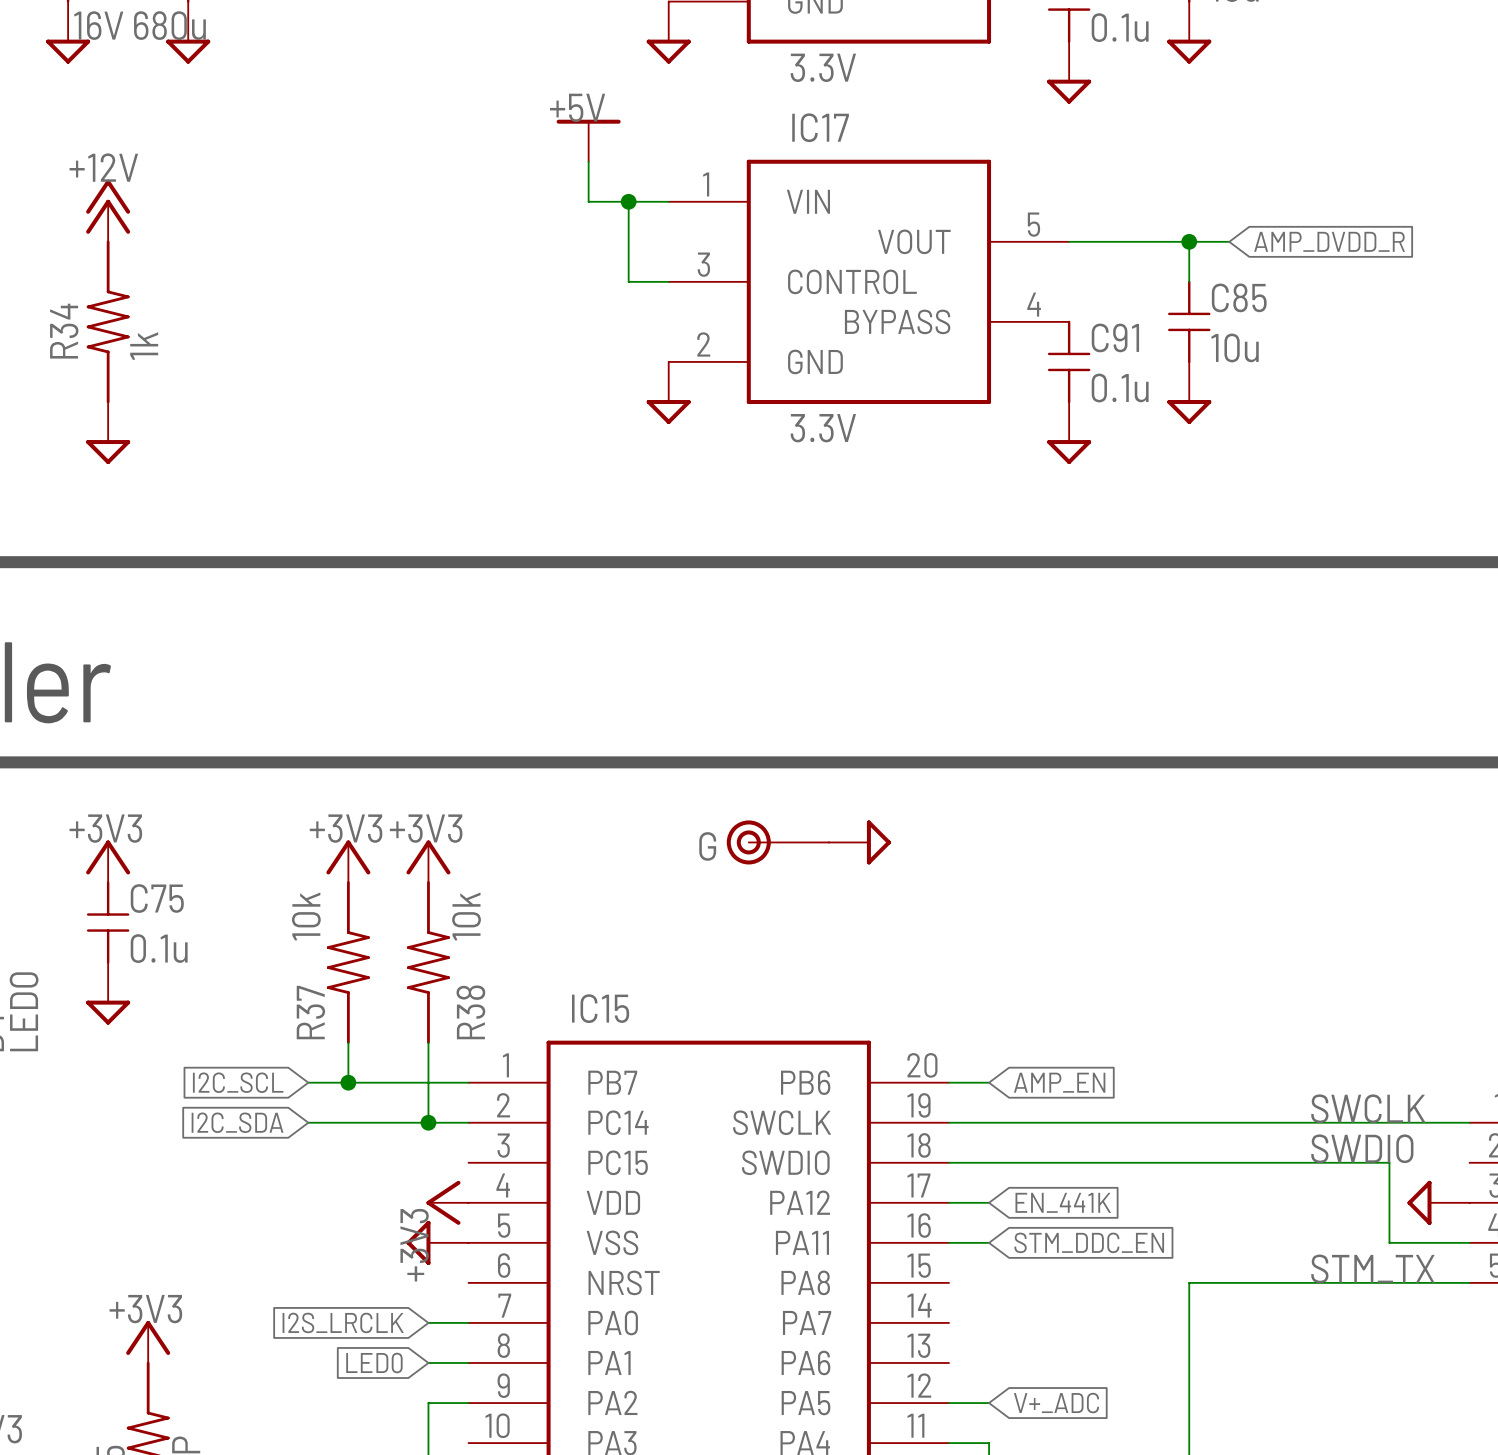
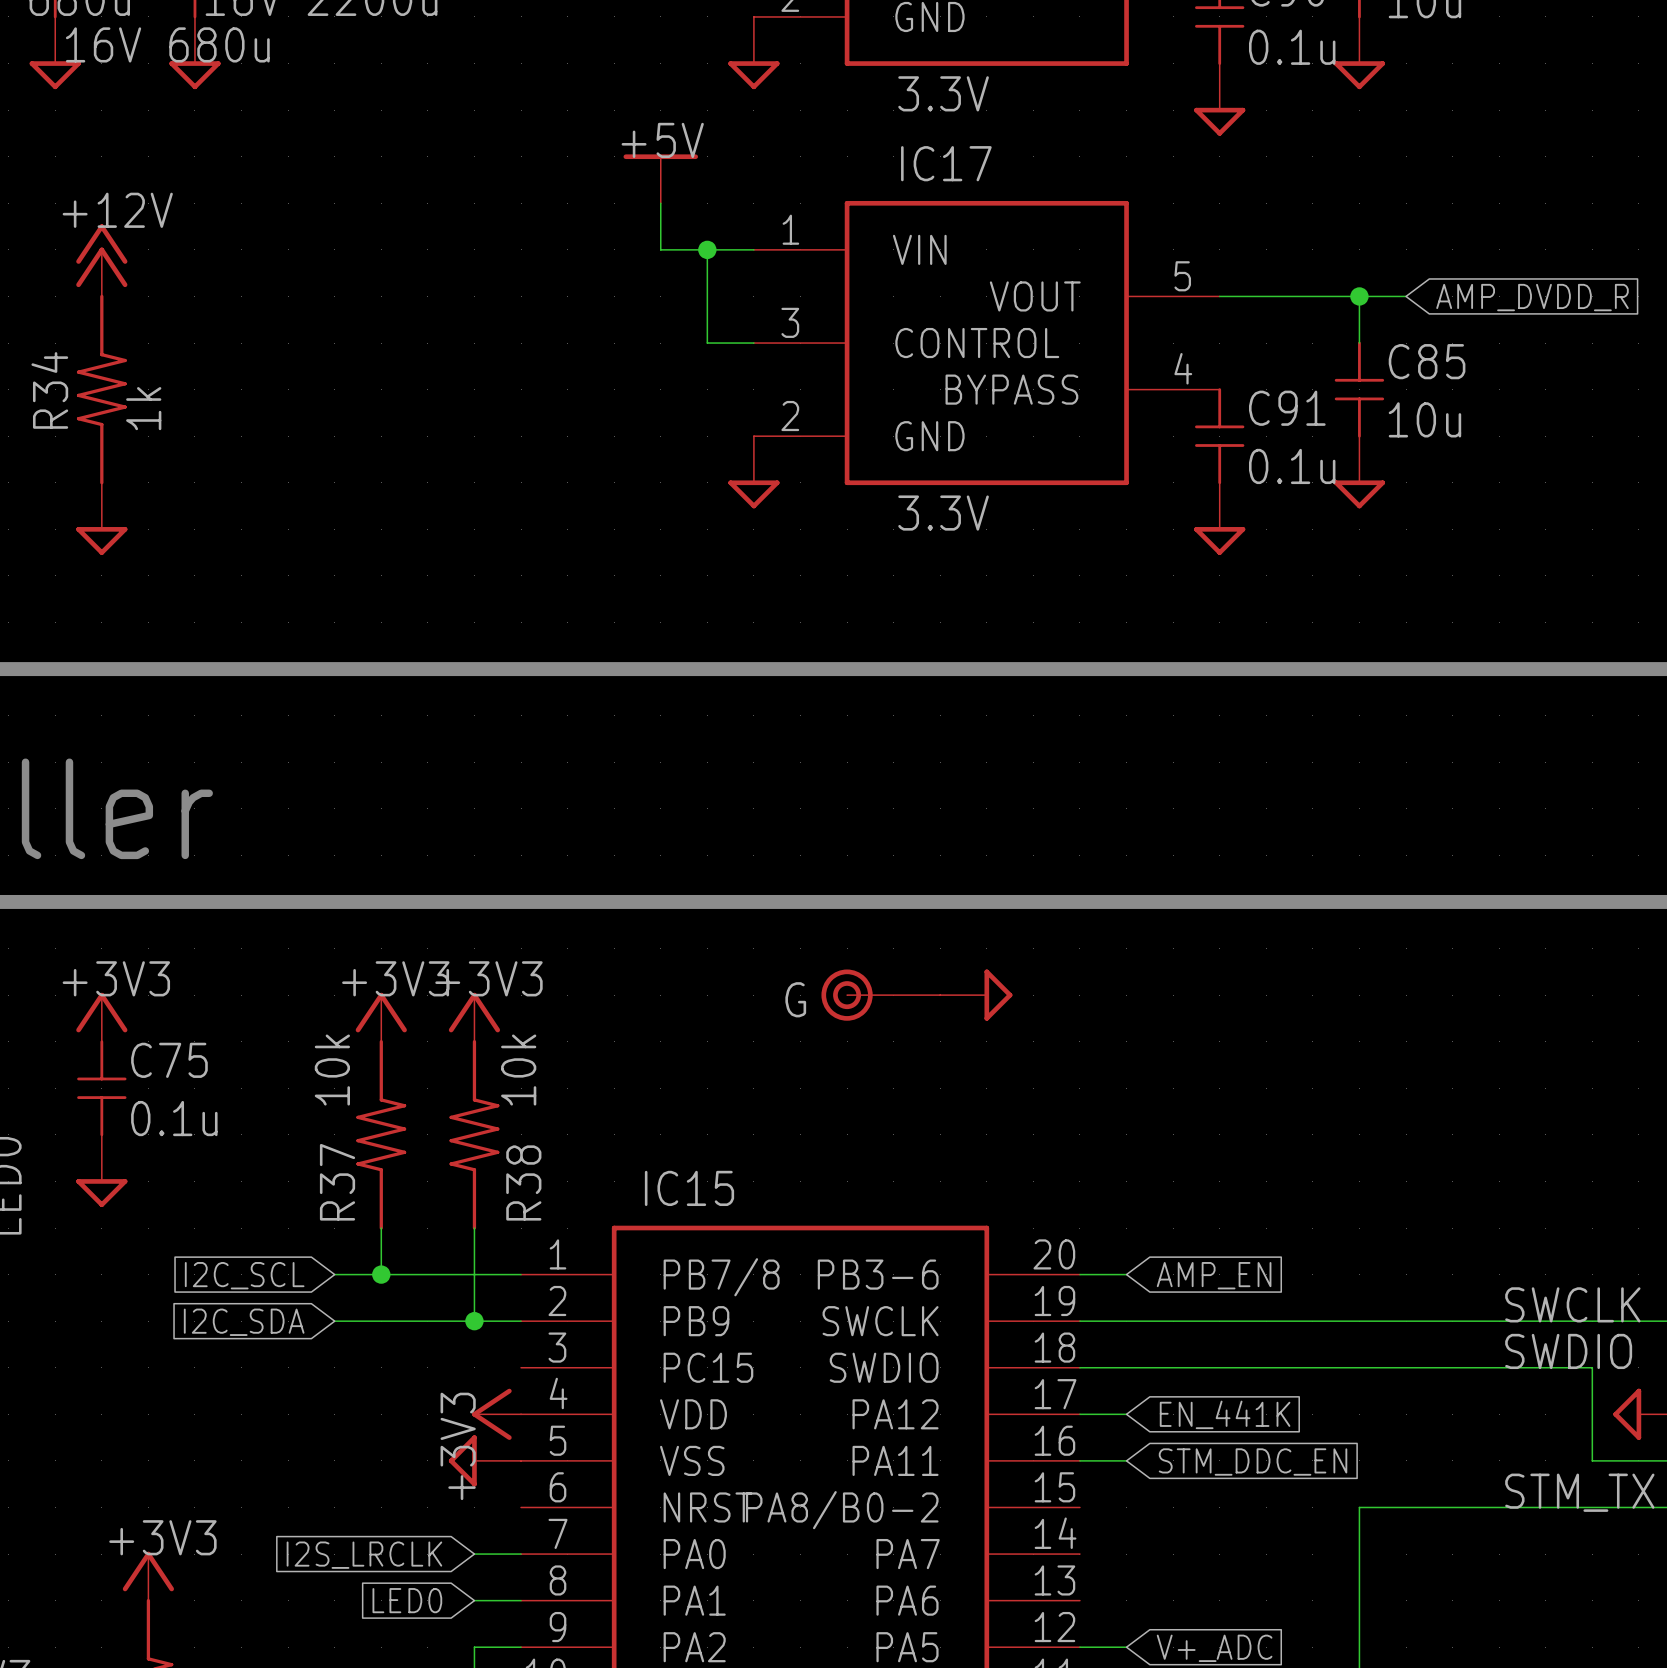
IC15 pin name: PB7 (612, 1082) -> PB7/8 (721, 1277)
IC15 pin name: PB6 (805, 1082) -> PB3-6 (878, 1274)
IC15 pin name: PC14 (618, 1122) -> PB9 (696, 1321)
IC15 pin name: PA8 (805, 1282) -> PA8/B0-2 (842, 1510)

